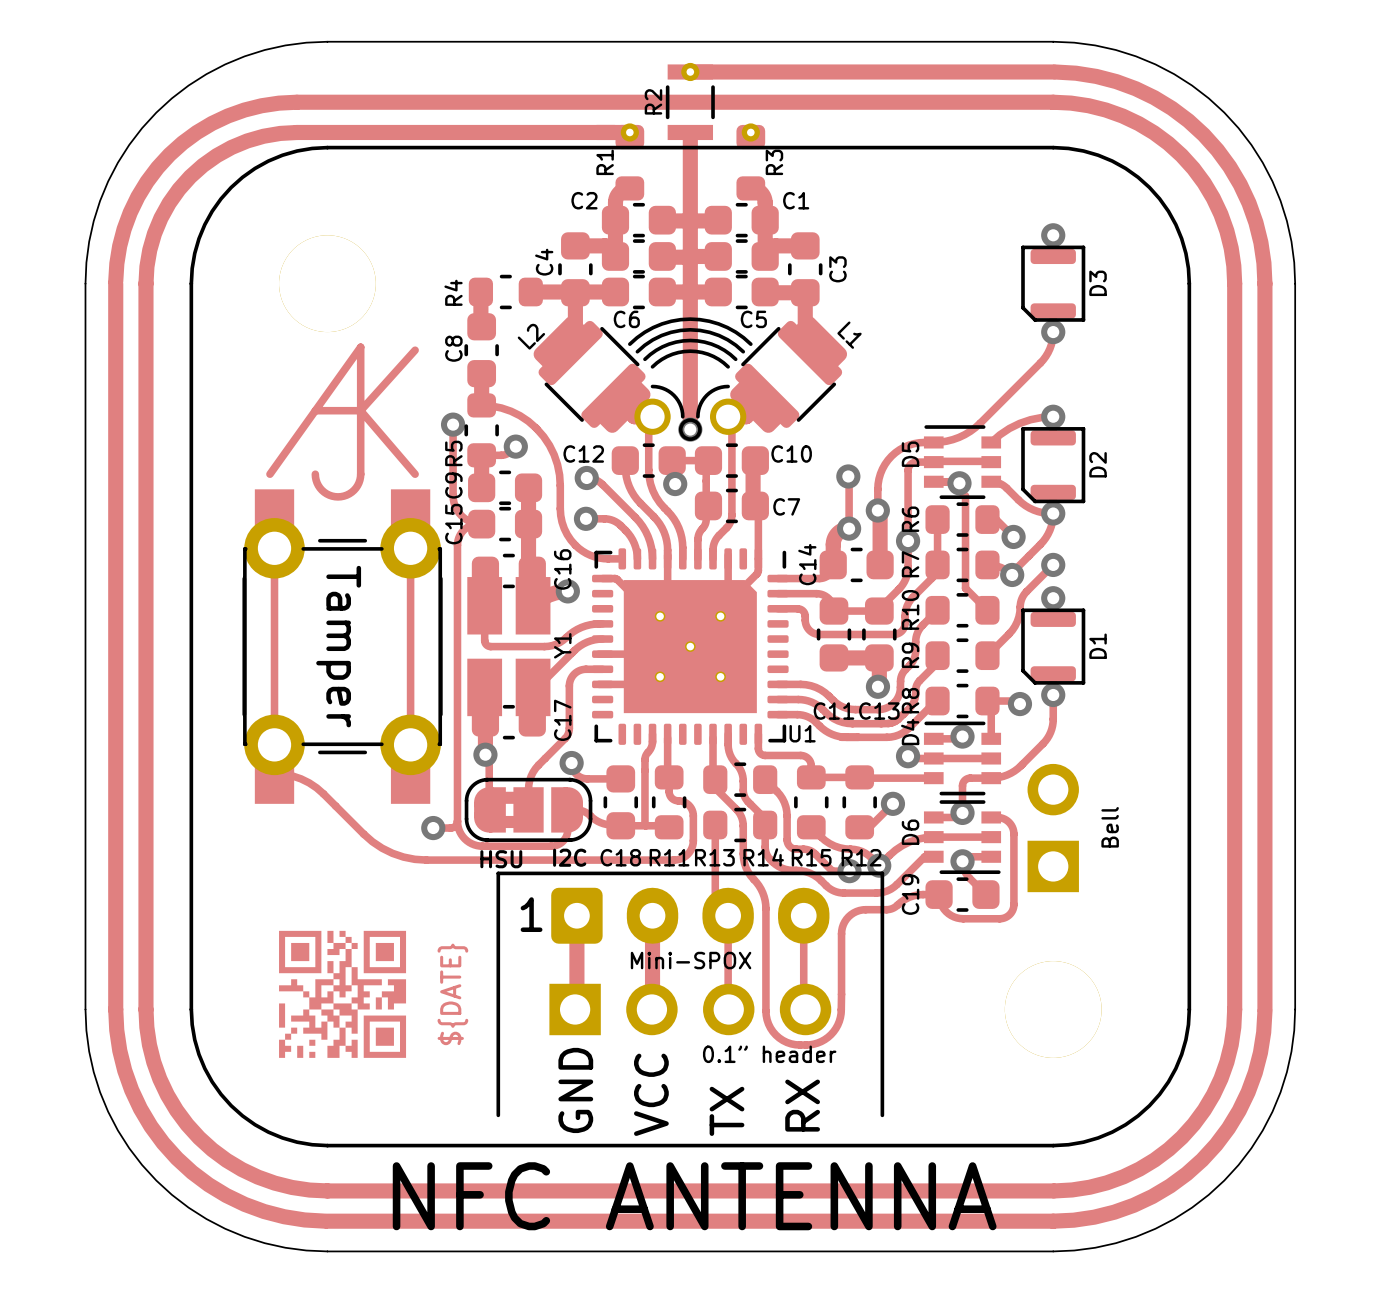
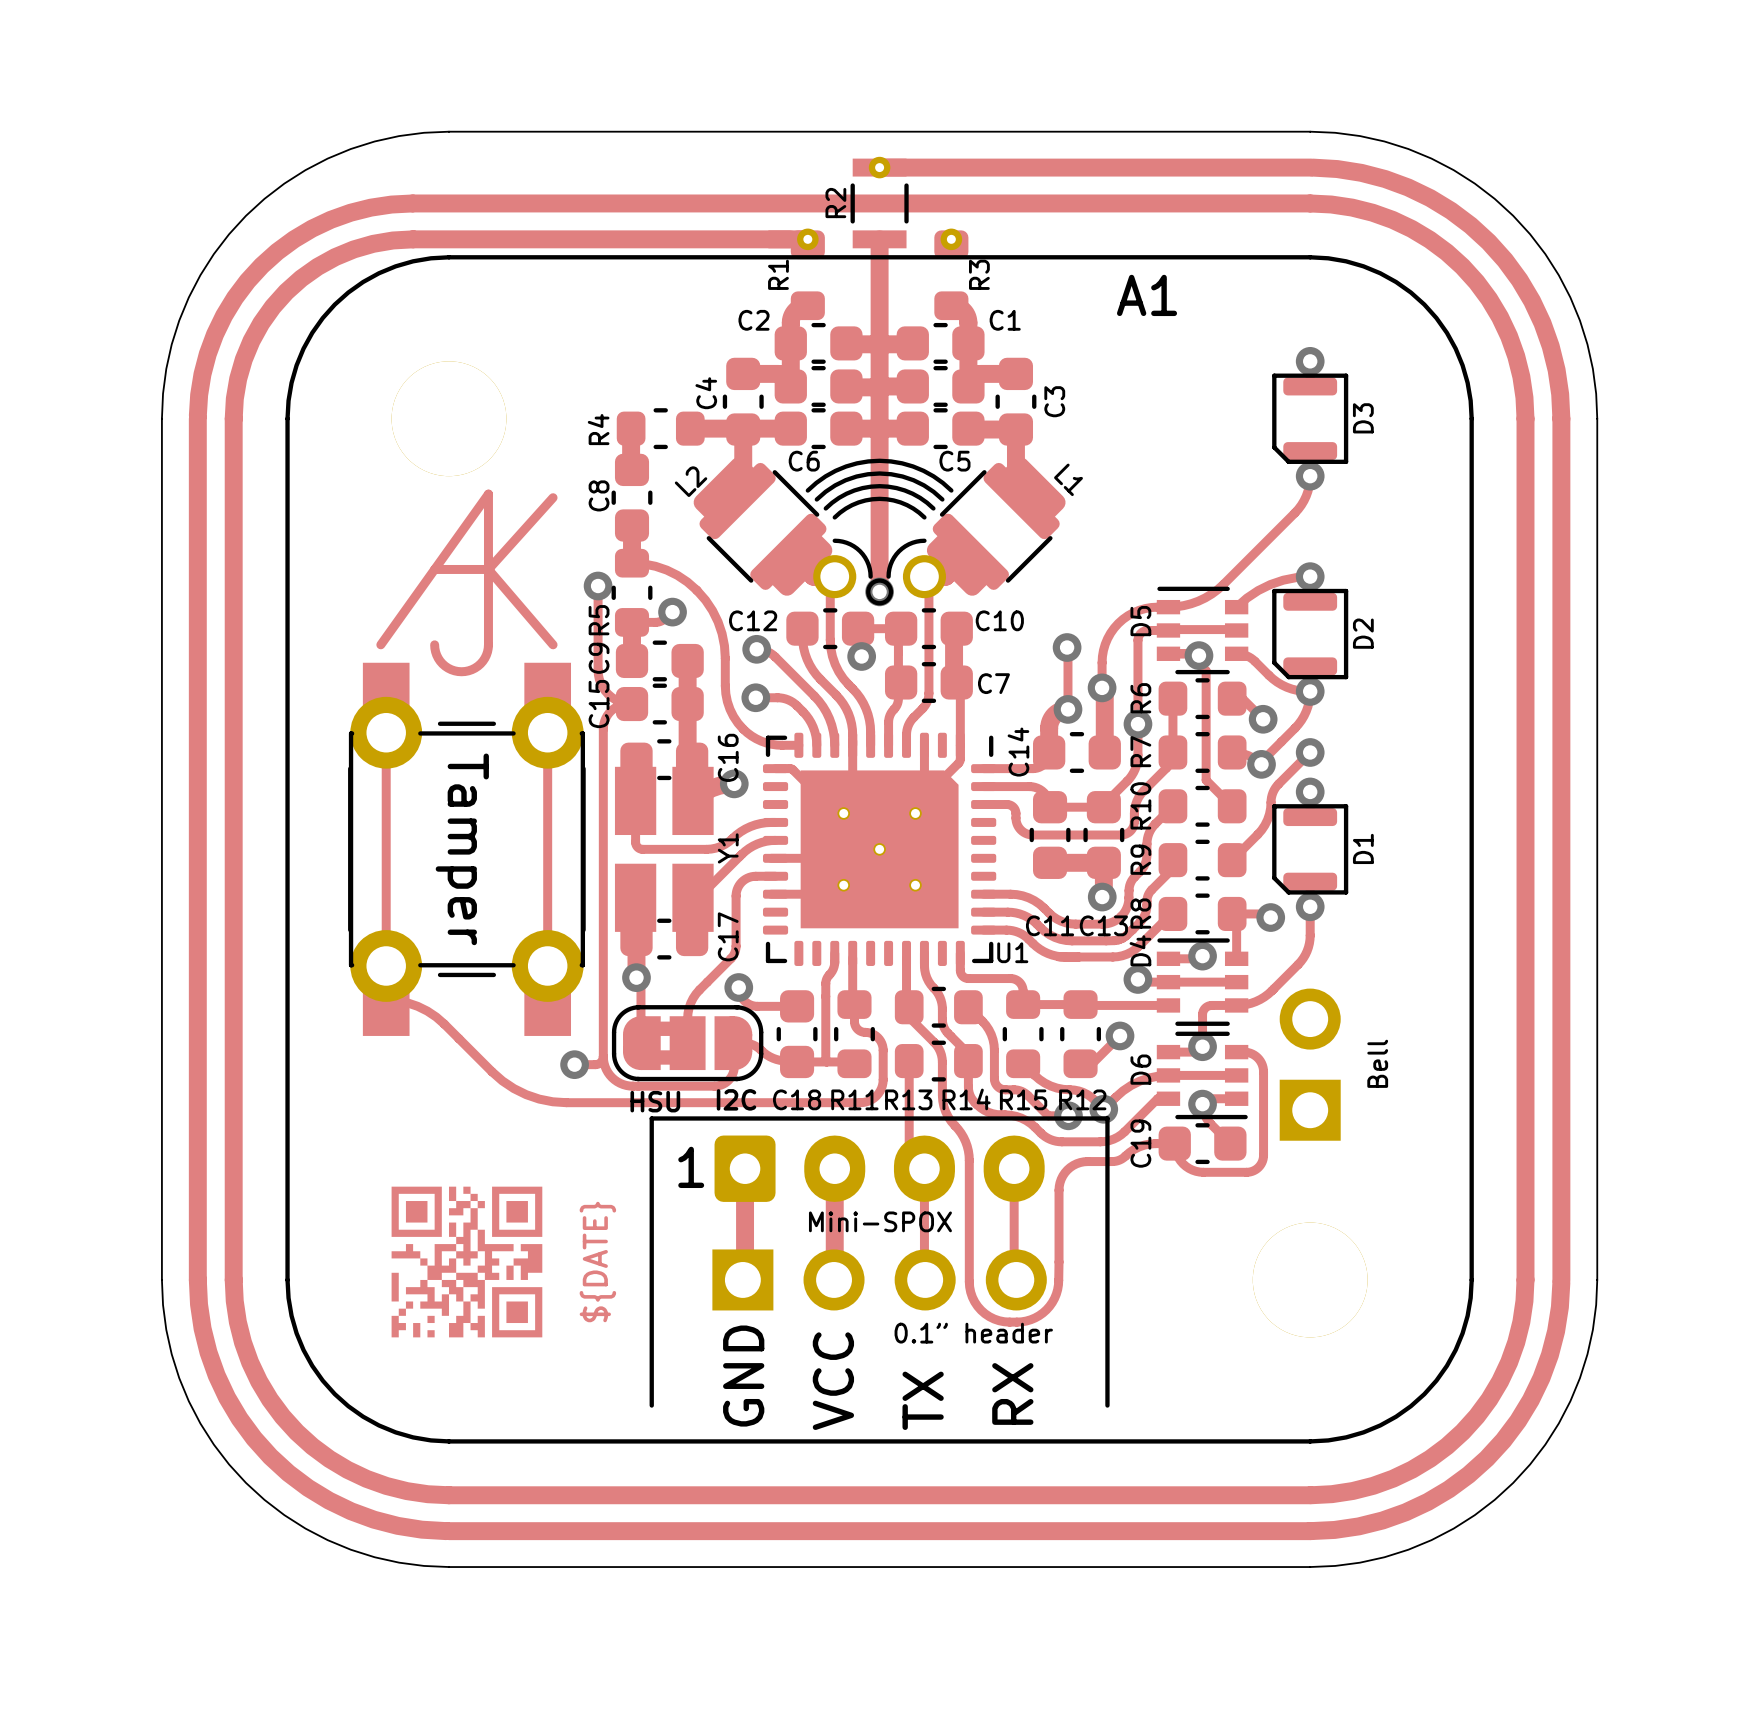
part: (690, 645) -> none
A1: none -> (879, 848)

